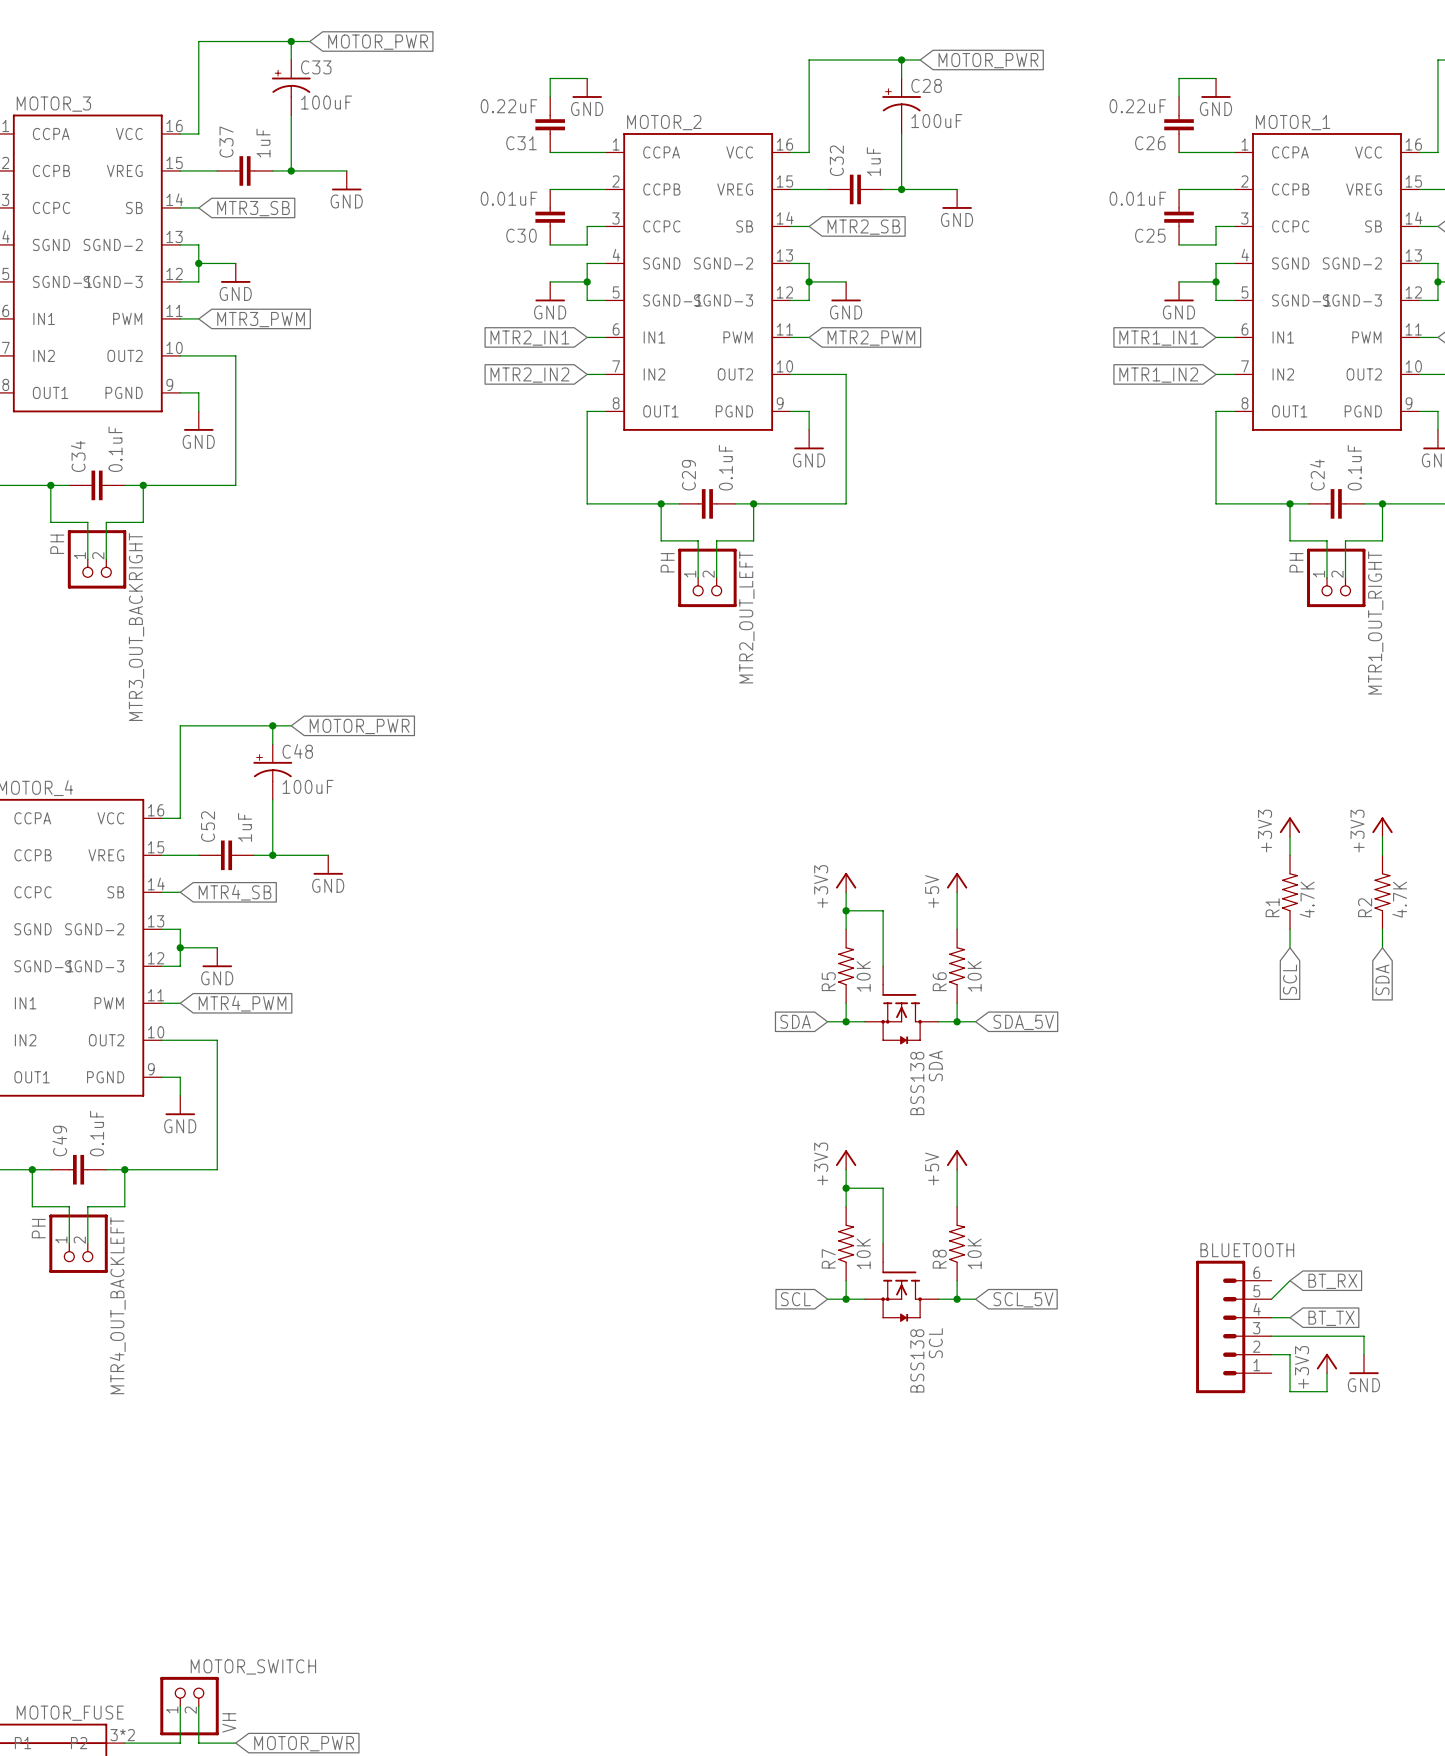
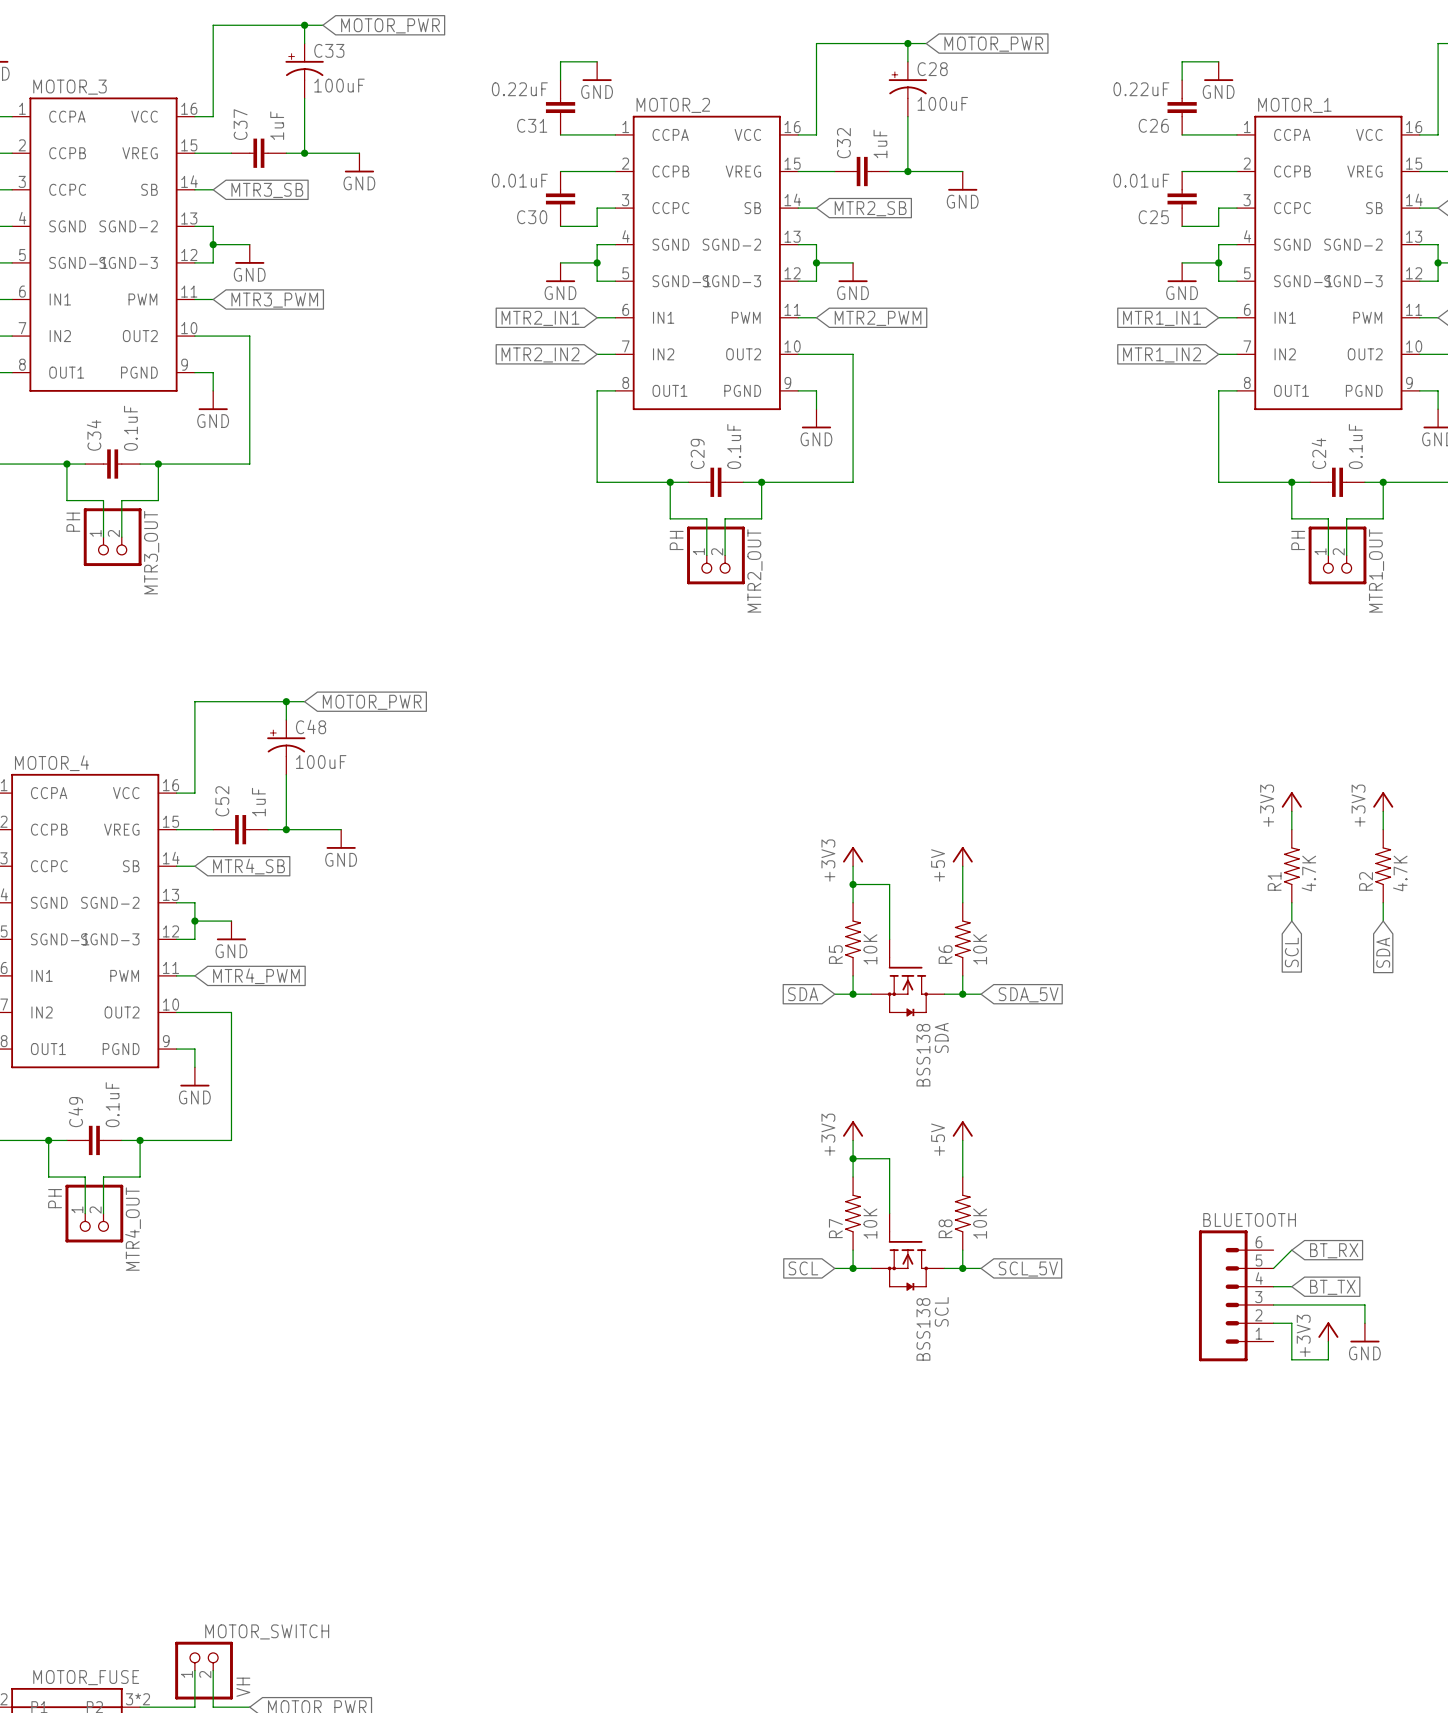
MTR2_OUT_LEFT name: MTR2_OUT_LEFT (746, 617) -> MTR2_OUT (754, 570)
MTR1_OUT_RIGHT name: MTR1_OUT_RIGHT (1375, 622) -> MTR1_OUT (1376, 570)
MTR3_OUT_BACKRIGHT name: MTR3_OUT_BACKRIGHT (136, 626) -> MTR3_OUT (151, 552)
MTR4_OUT_BACKLEFT name: MTR4_OUT_BACKLEFT (117, 1305) -> MTR4_OUT (133, 1229)

